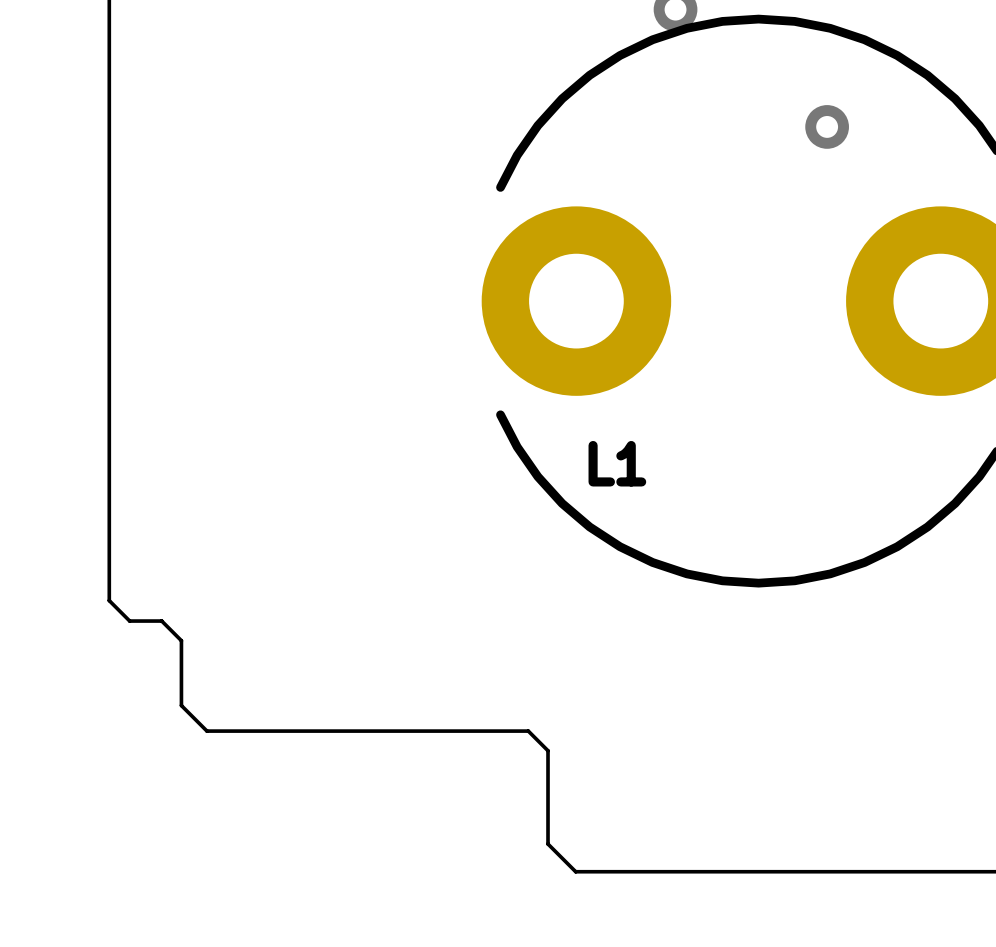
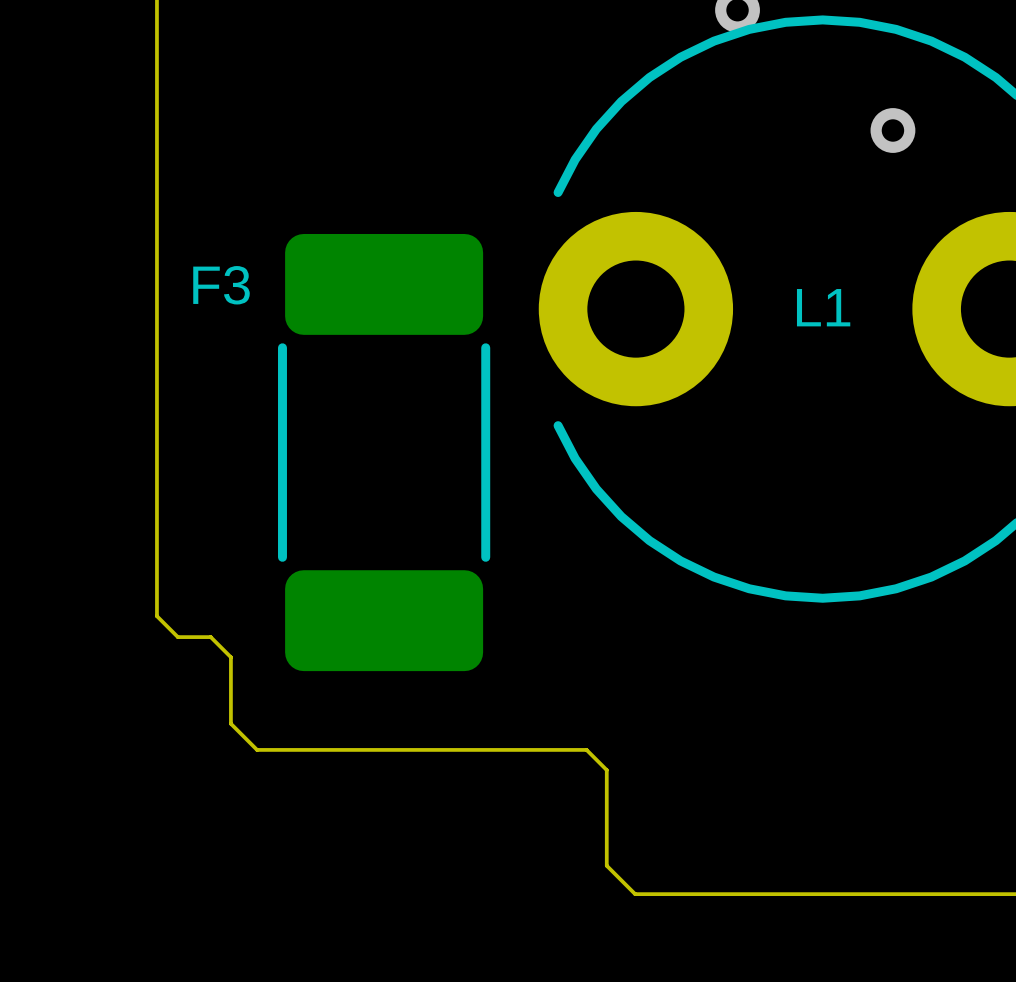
F3: none -> (384, 452)
L1 name position: L1 (617, 463) -> L1 (823, 307)

